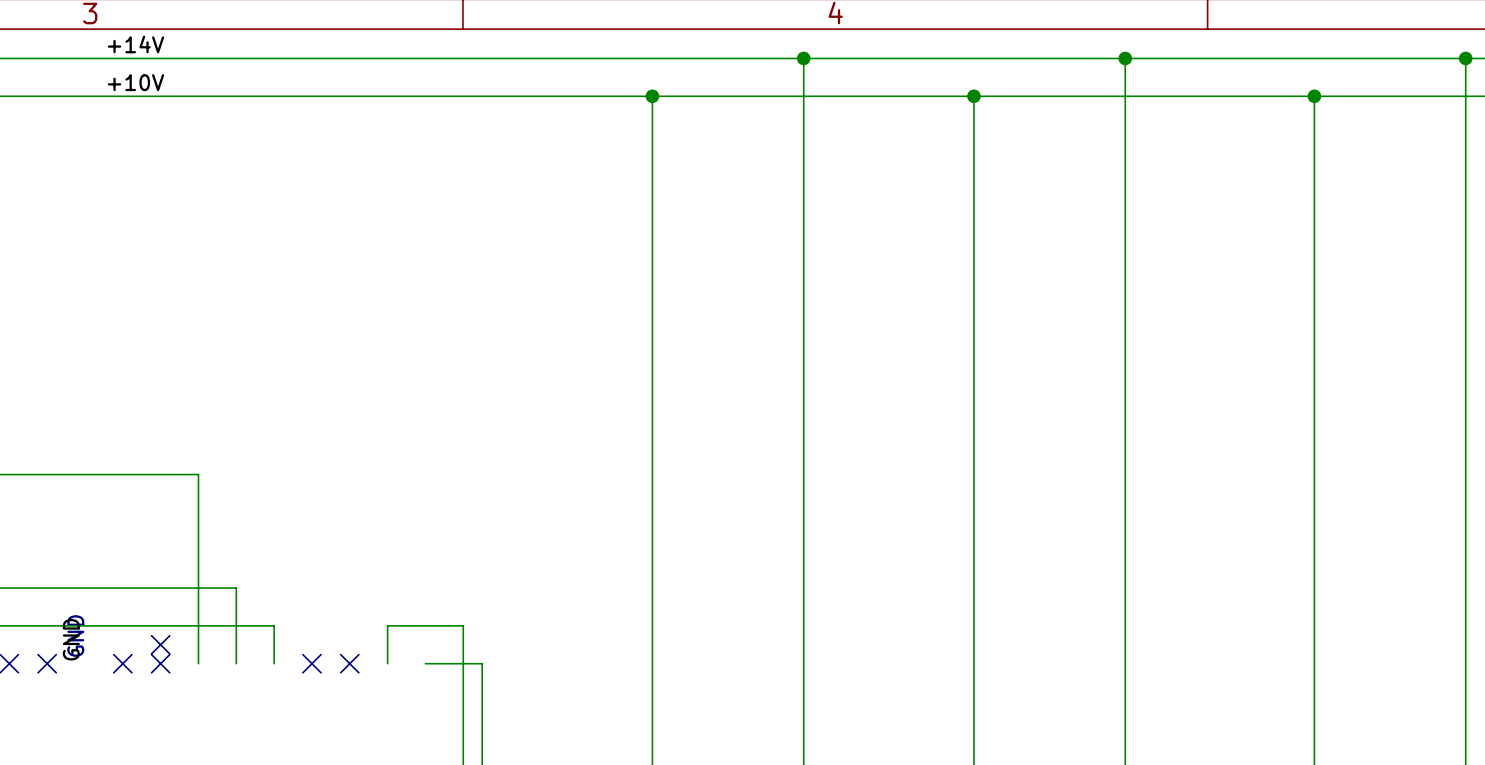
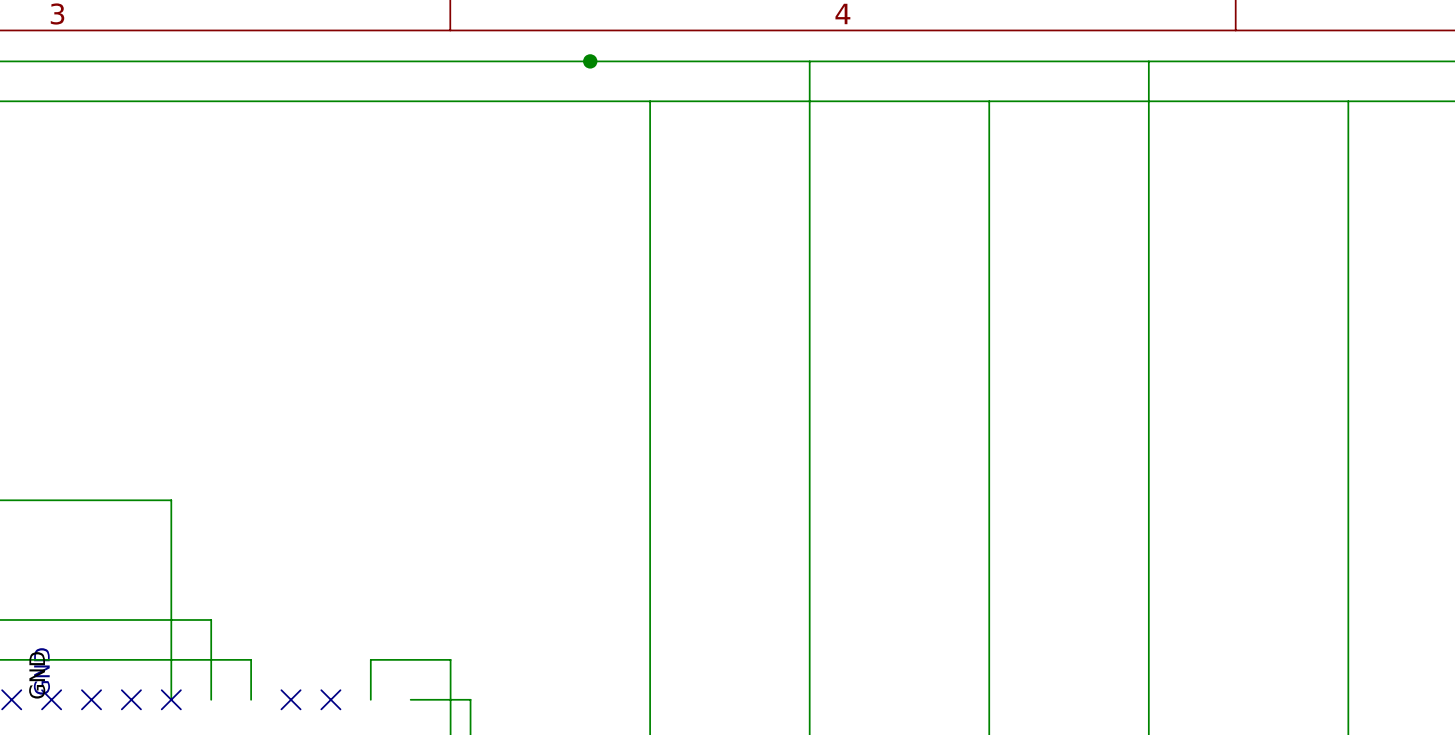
label: +14V (135, 44) -> none
junction: (803, 58) -> none
junction: (1125, 58) -> none
label: +10V (135, 82) -> none
junction position: (652, 96) -> (590, 61)
junction: (973, 96) -> none
junction: (1314, 96) -> none
no-connect mark: (160, 644) -> none
no-connect mark: none -> (51, 699)
no-connect mark: none -> (171, 699)

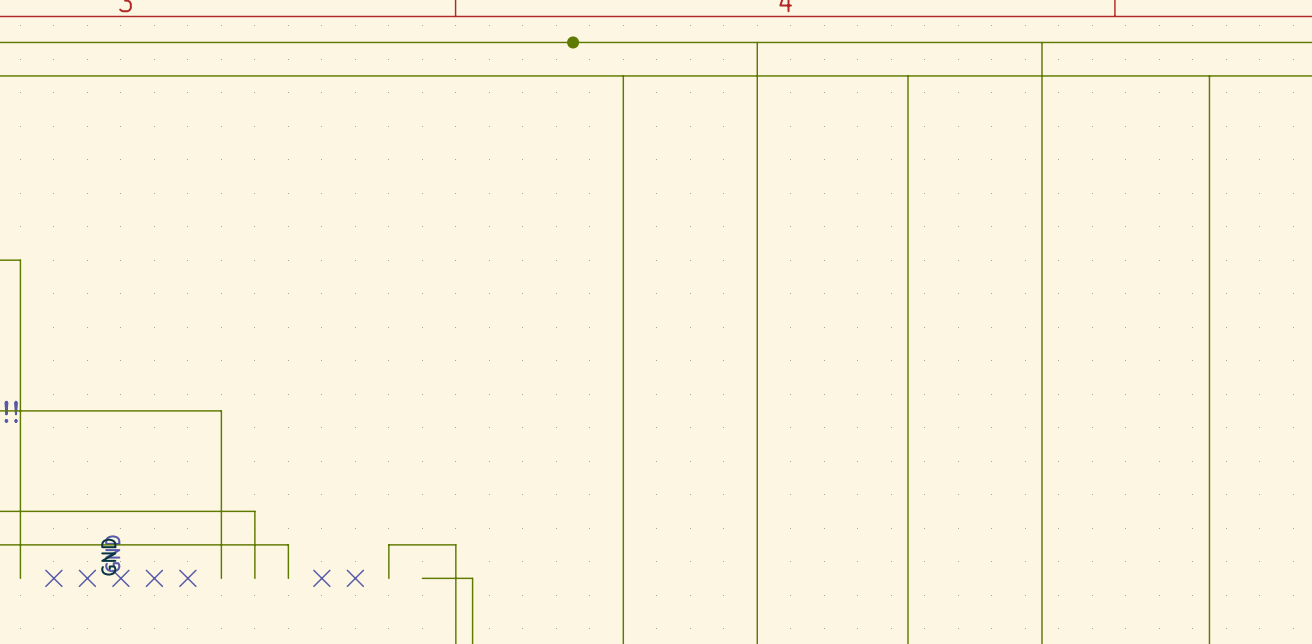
no-connect mark: (171, 699) -> none

